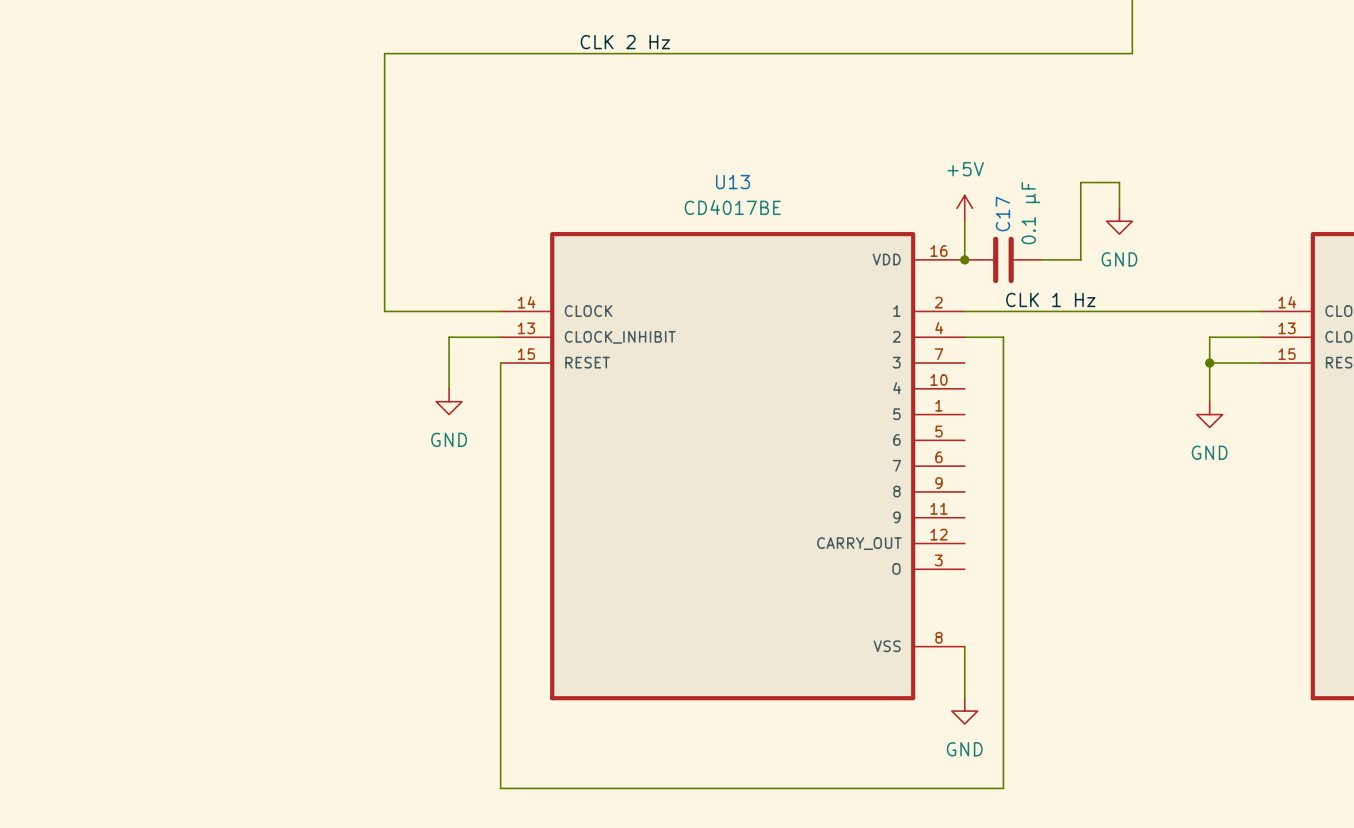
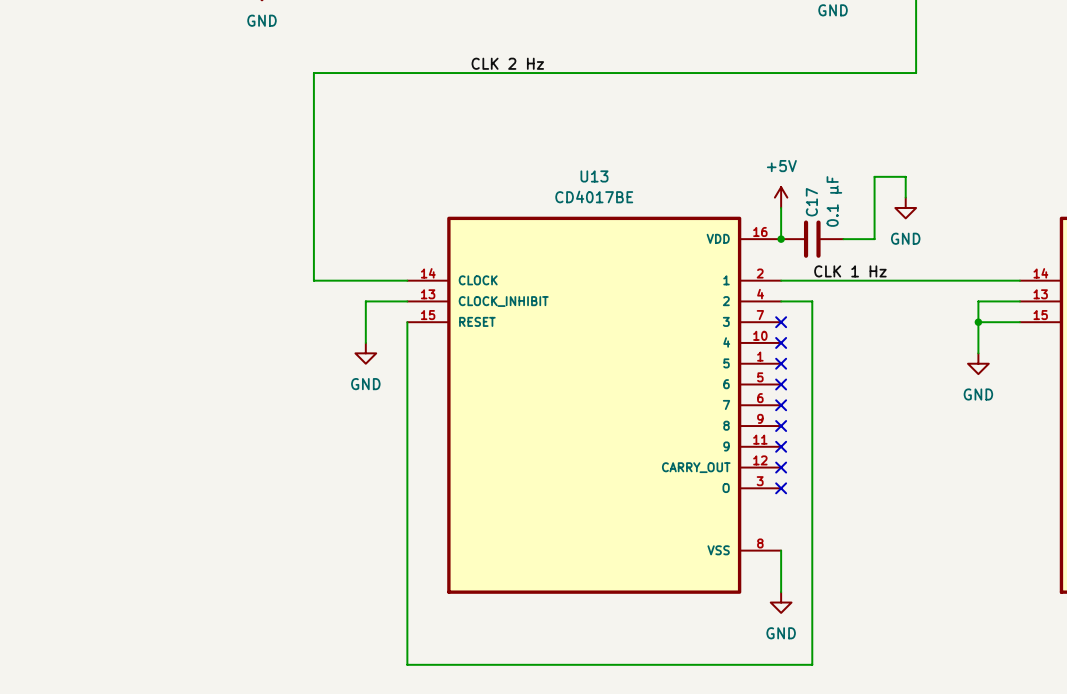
no-connect mark: none -> (781, 322)
no-connect mark: none -> (781, 342)
no-connect mark: none -> (781, 363)
no-connect mark: none -> (781, 384)
no-connect mark: none -> (781, 405)
no-connect mark: none -> (781, 426)
no-connect mark: none -> (781, 446)
no-connect mark: none -> (781, 467)
no-connect mark: none -> (781, 488)

